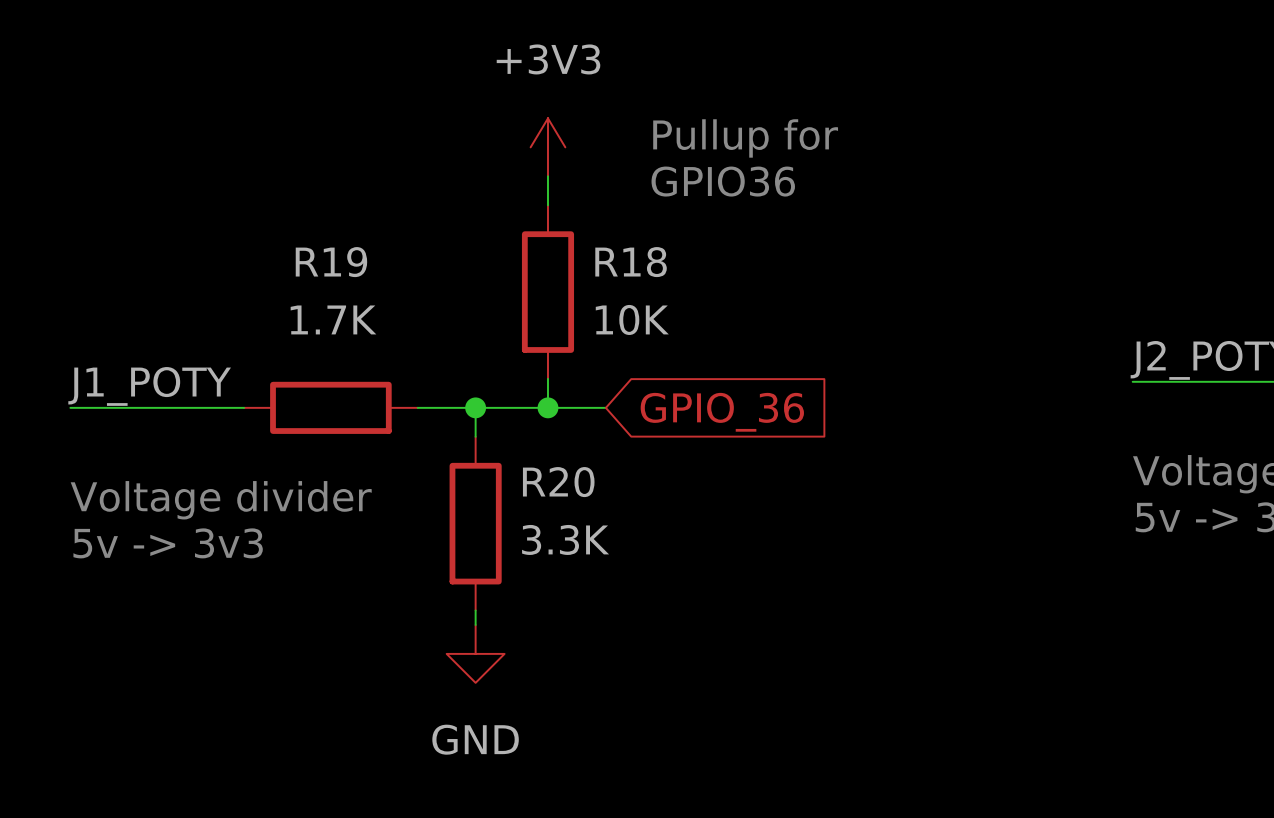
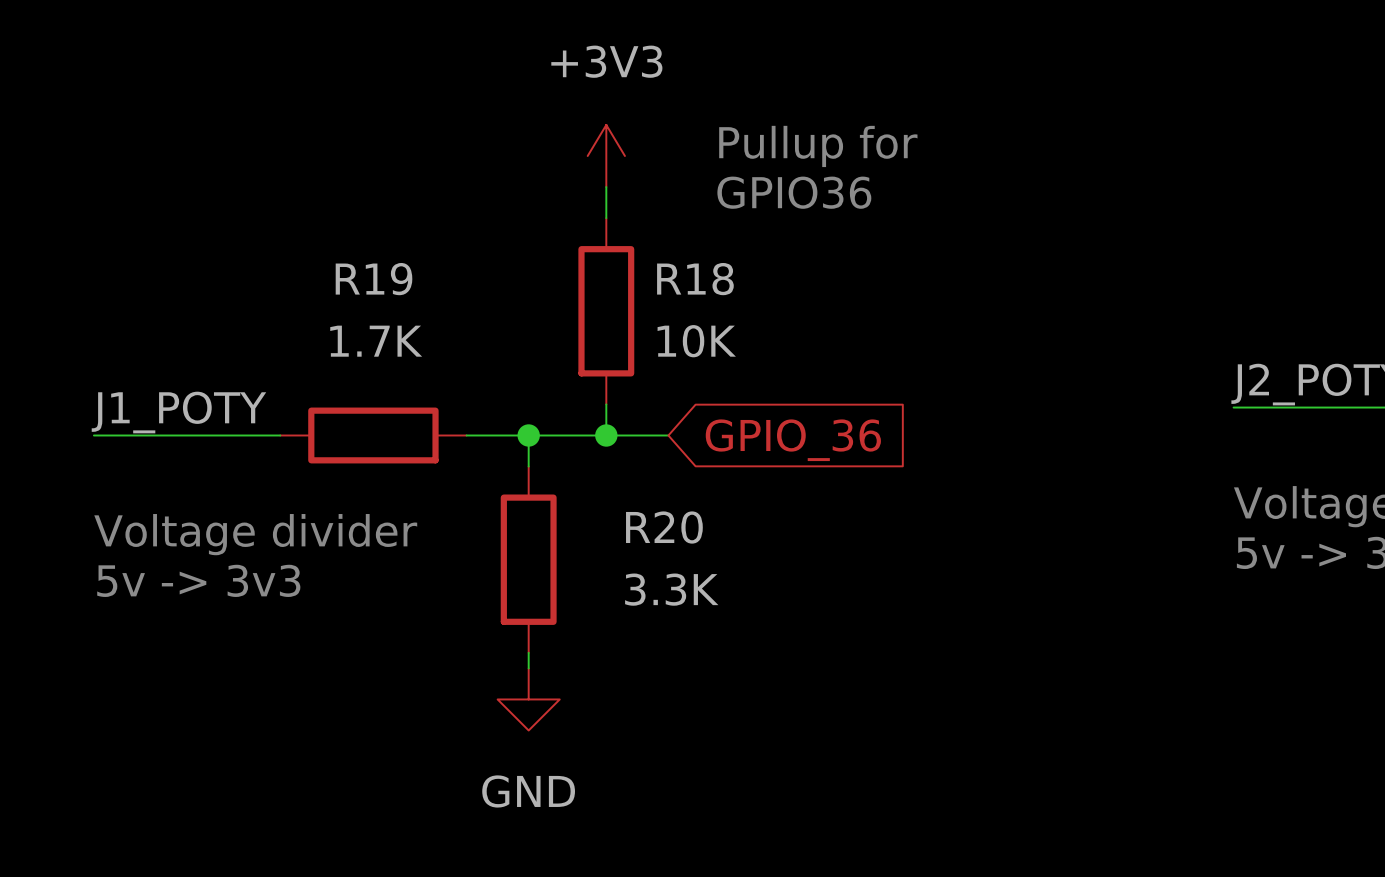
R20 name position: R20 (558, 482) -> R20 (664, 527)
R20 value position: 3.3K (565, 539) -> 3.3K (671, 589)

